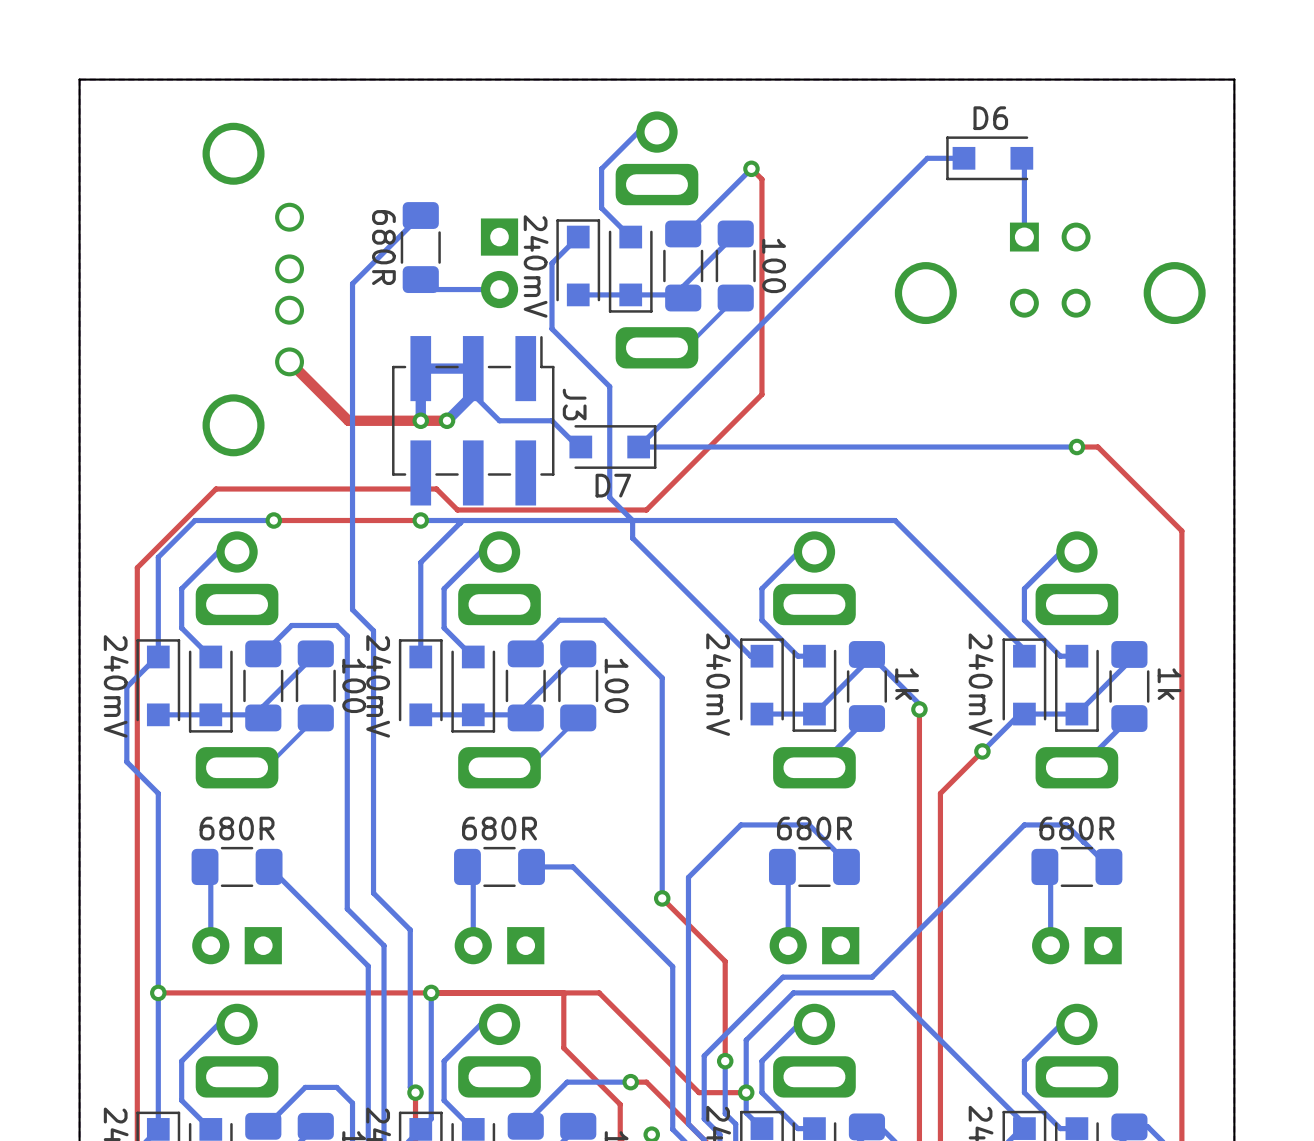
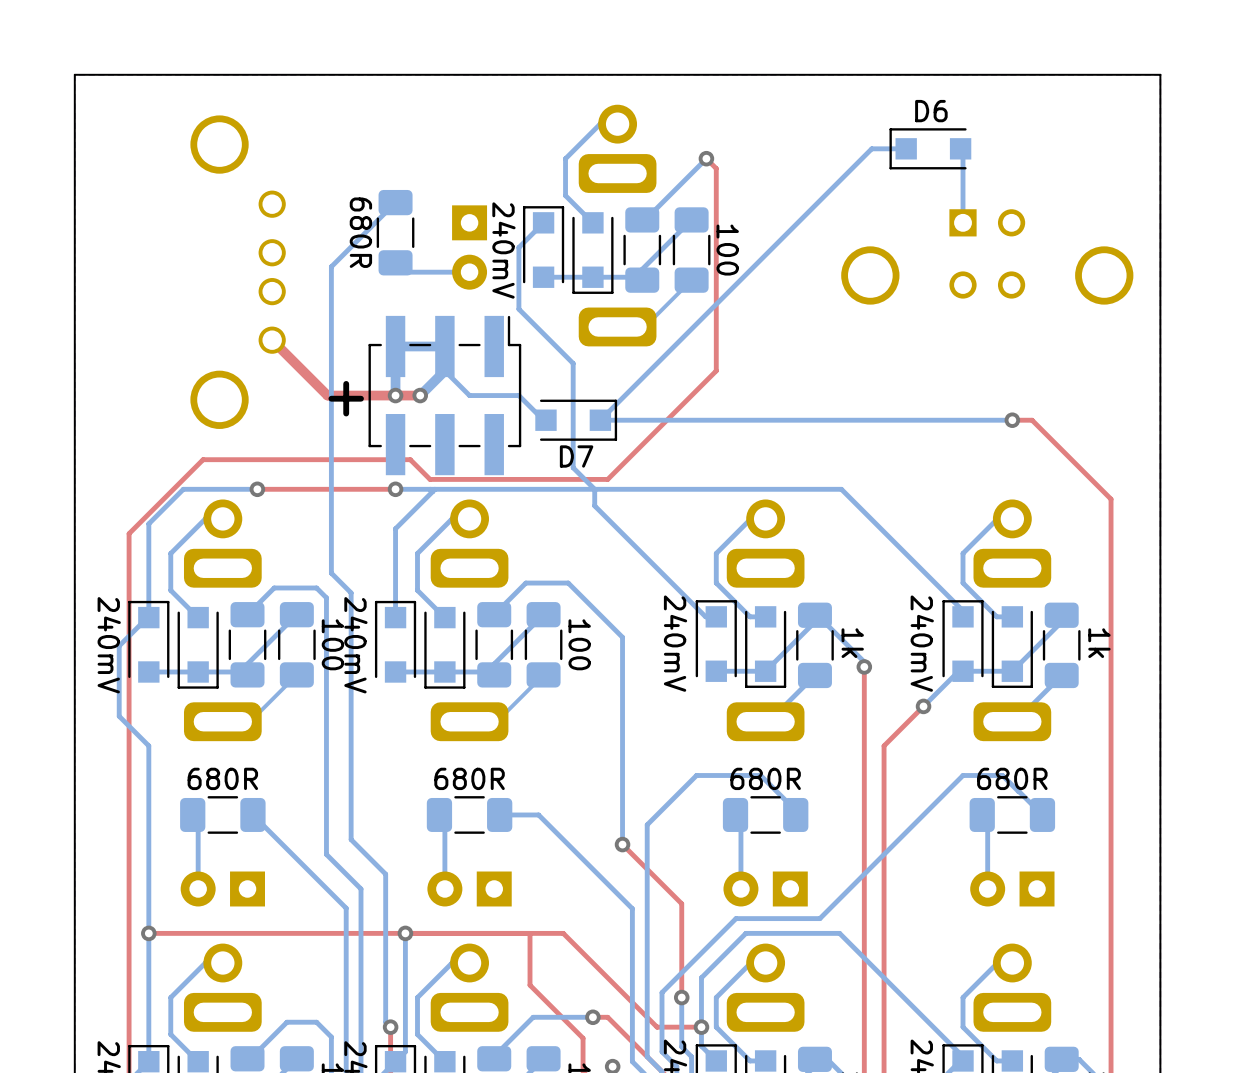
J3 name: J3 (574, 404) -> none
text: none -> + (346, 398)

